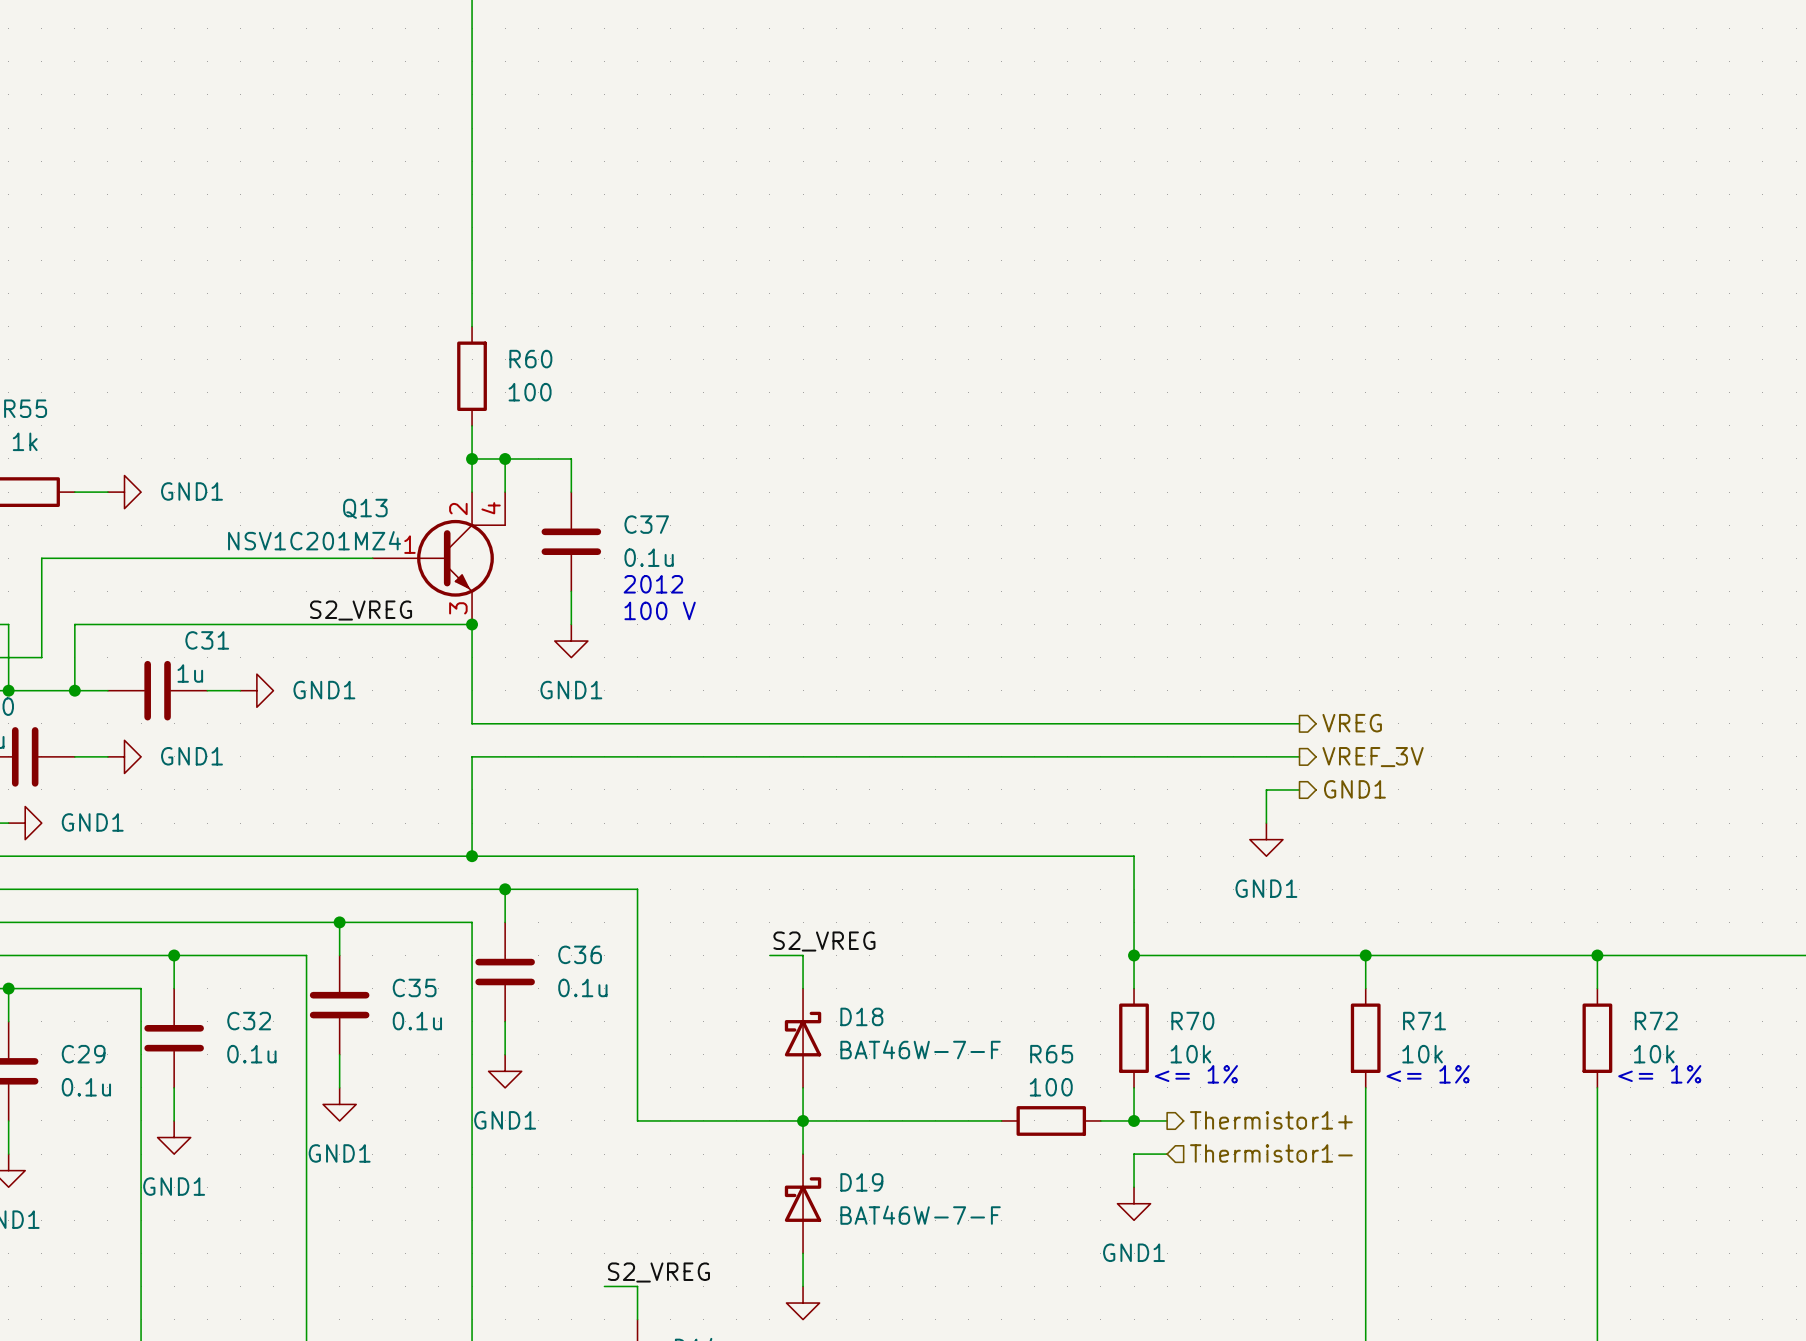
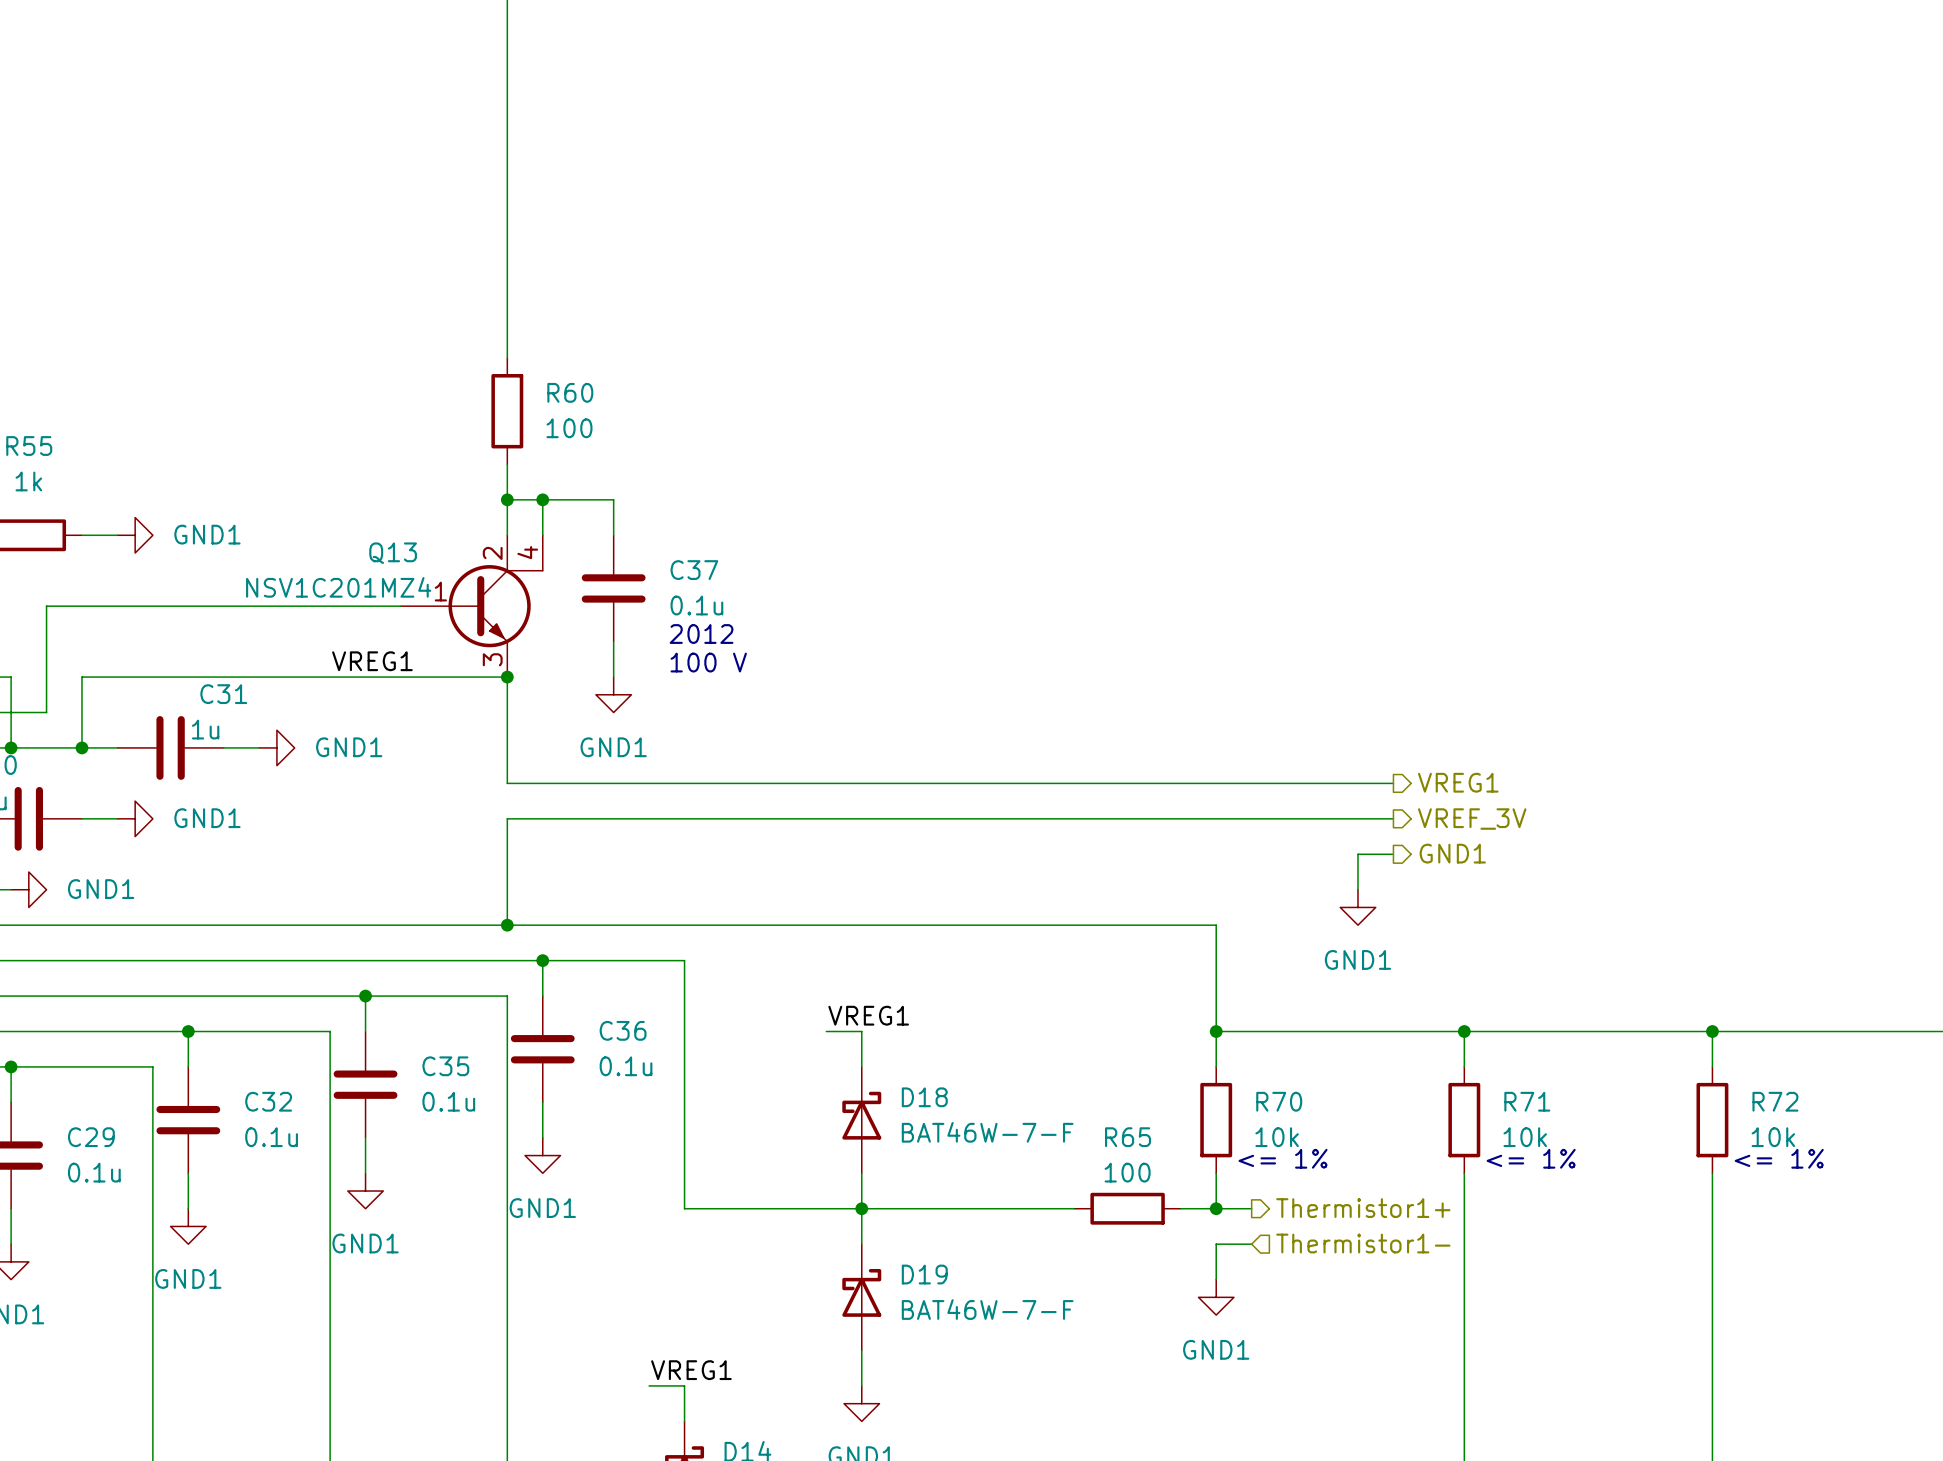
label: S2_VREG (361, 610) -> VREG1 (372, 661)
hierarchical label: VREG (1352, 723) -> VREG1 (1458, 782)
label: S2_VREG (824, 941) -> VREG1 (868, 1015)
label: S2_VREG (658, 1272) -> VREG1 (691, 1370)

